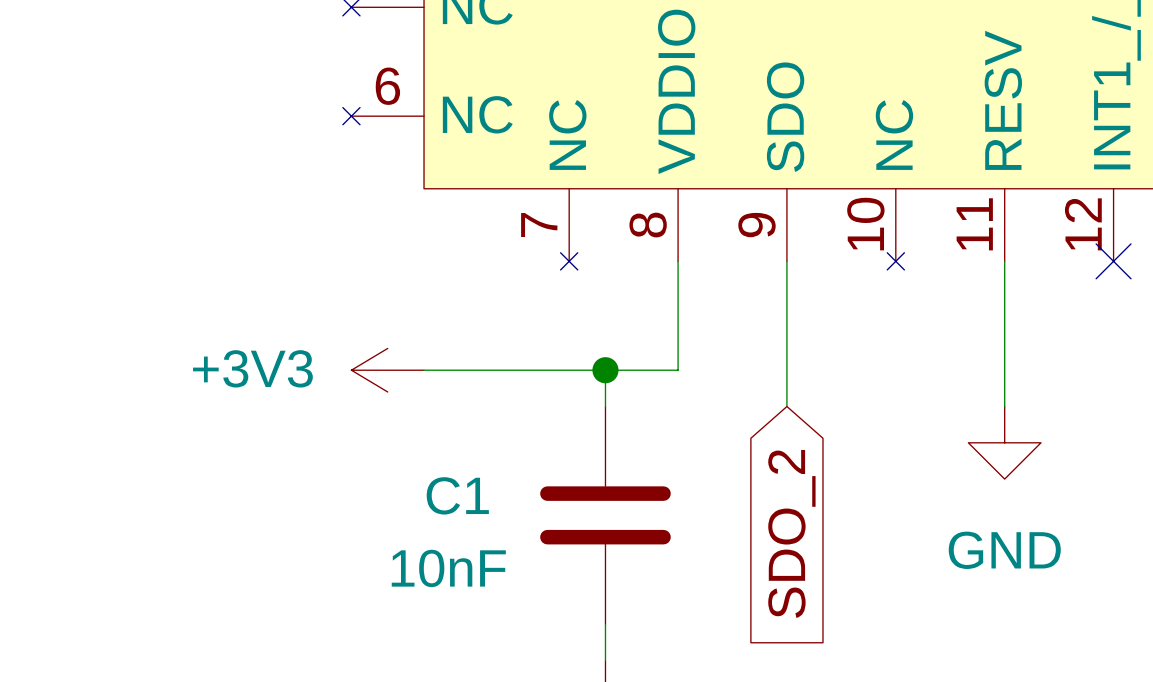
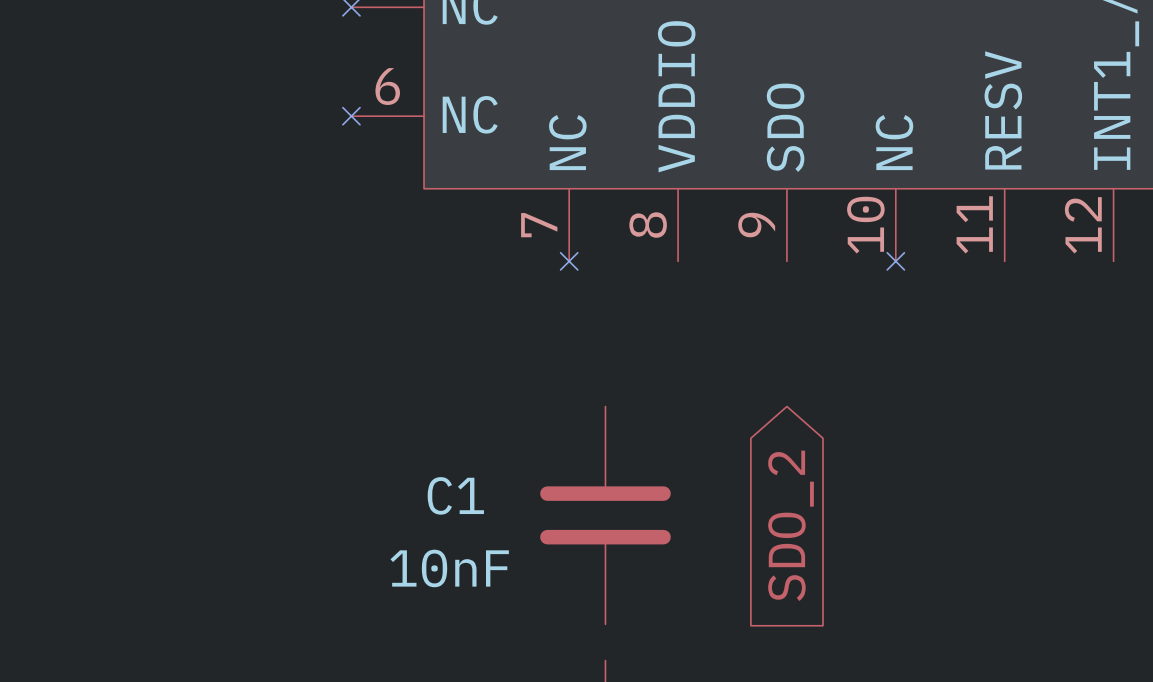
wire: (678, 261) (678, 370) (424, 370) -> none
wire: (786, 261) (786, 406) -> none
wire: (1004, 261) (1004, 406) -> none
no-connect mark: (1113, 261) -> none
power symbol: +3V3 (387, 370) -> none
wire: (605, 370) (605, 406) -> none
junction: (605, 370) -> none
power symbol: GND (1004, 442) -> none
wire: (605, 624) (605, 660) -> none

